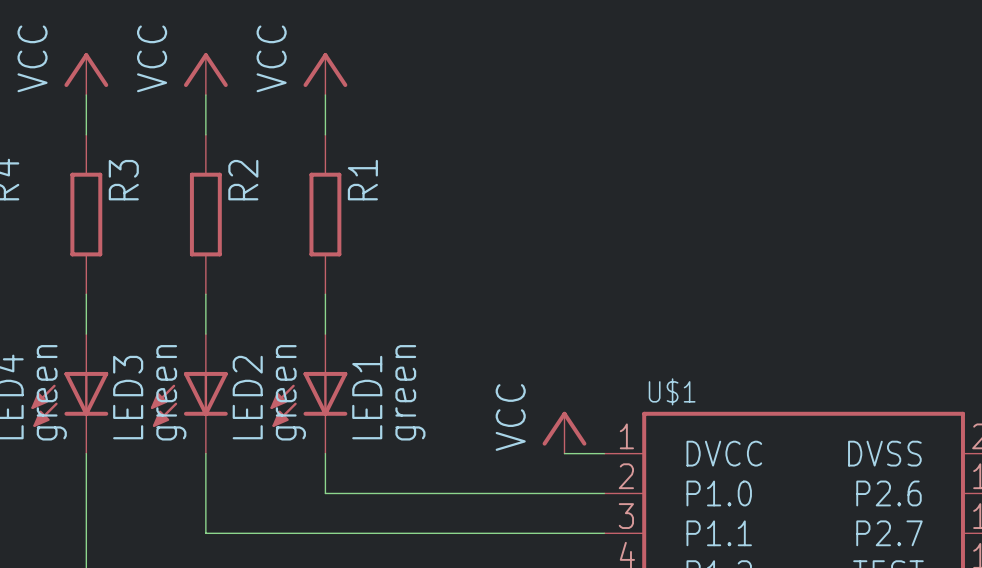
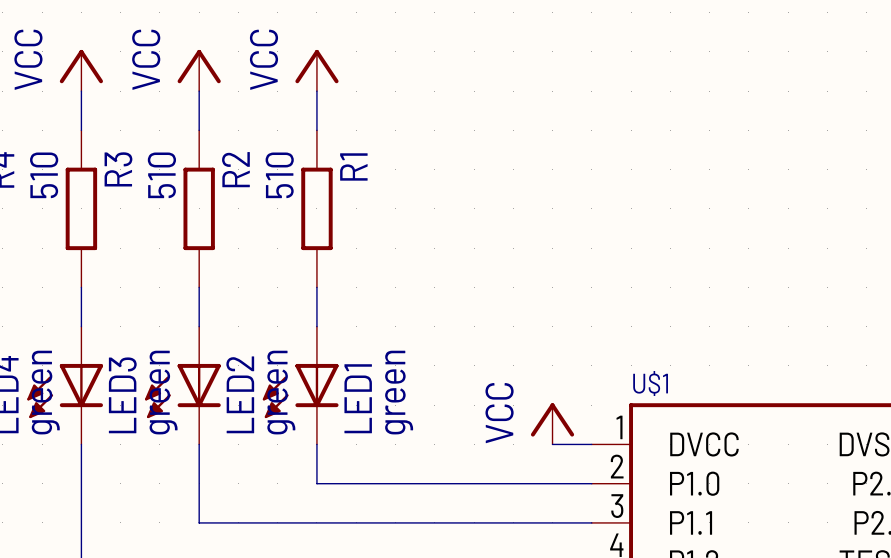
R3 value: none -> 510 (44, 175)
R2 value: none -> 510 (161, 175)
R1 value: none -> 510 (279, 175)

